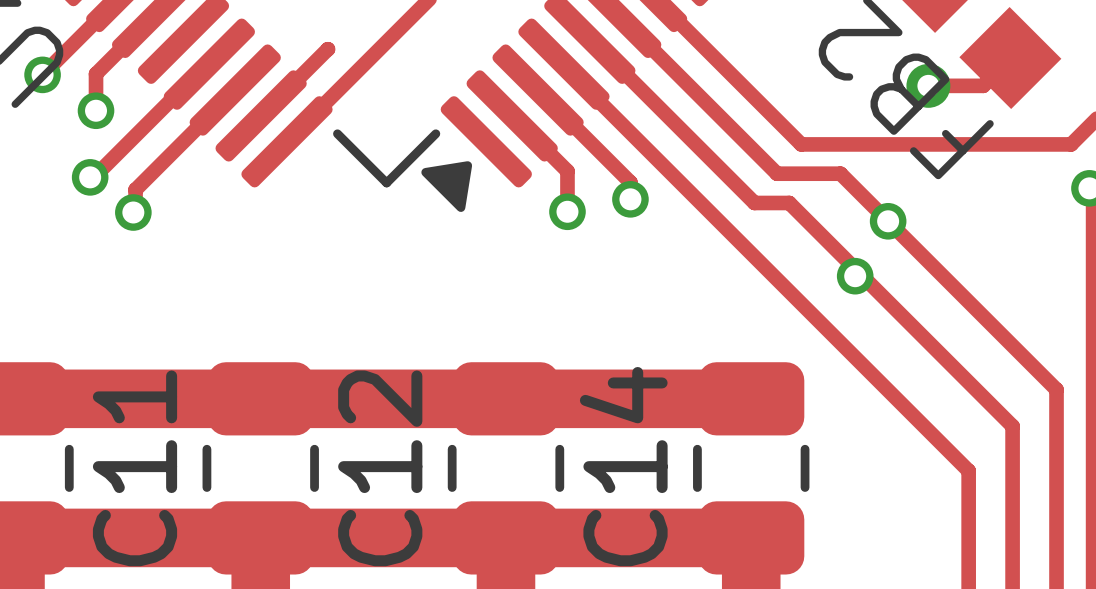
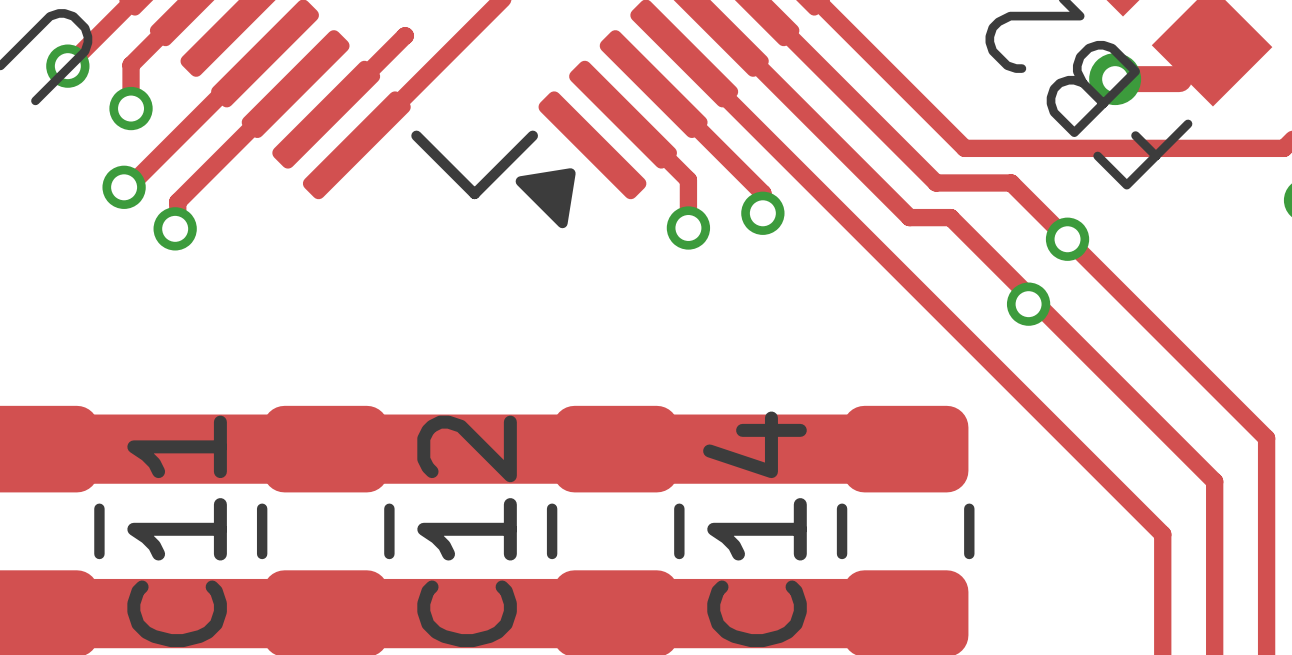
track width: thin (928, 85) (983, 85) -> thick (1115, 79) (1180, 79)

